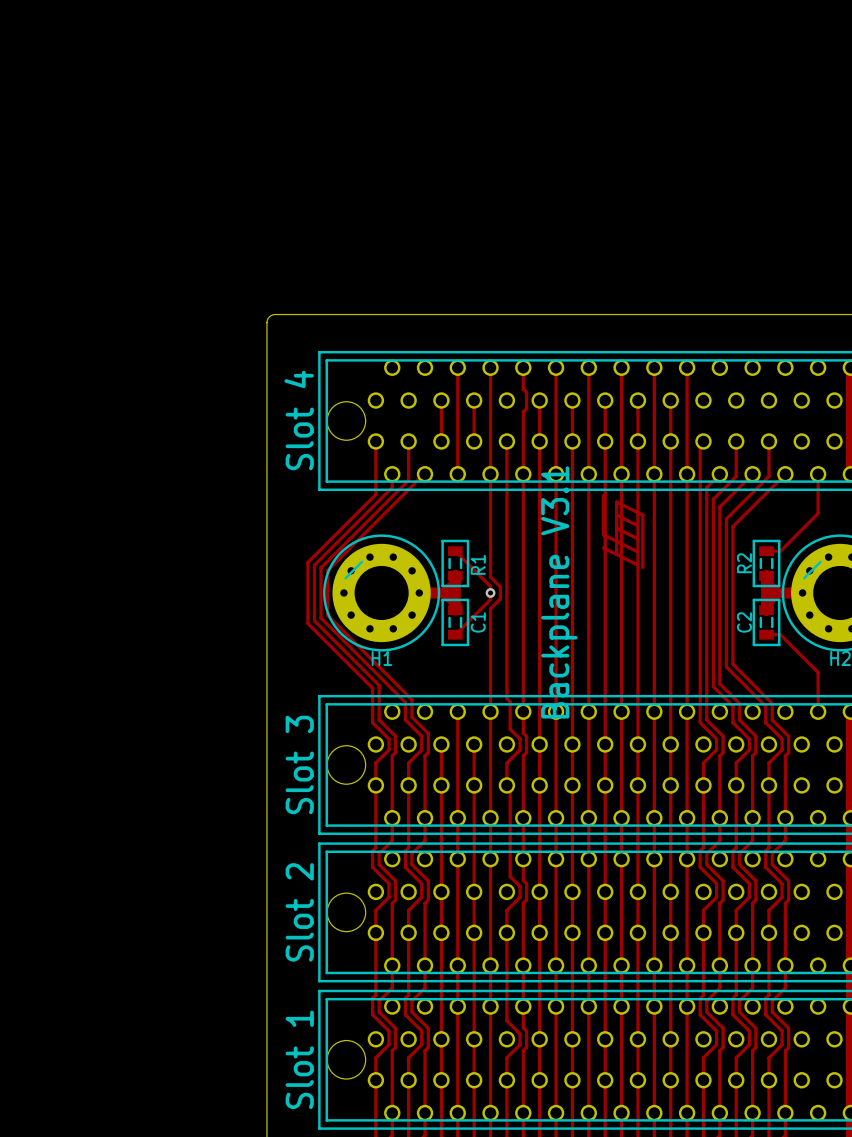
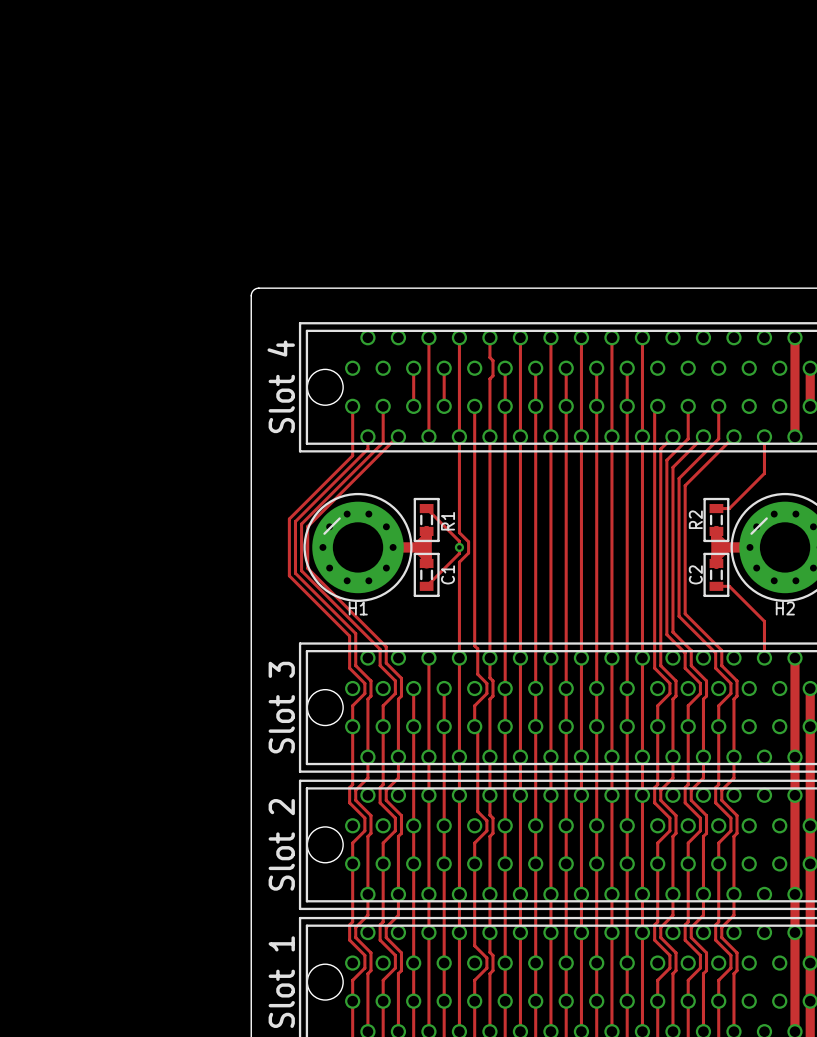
drawing: [601, 493, 645, 570] -> none
text: Backplane V3.1 (559, 592) -> none

